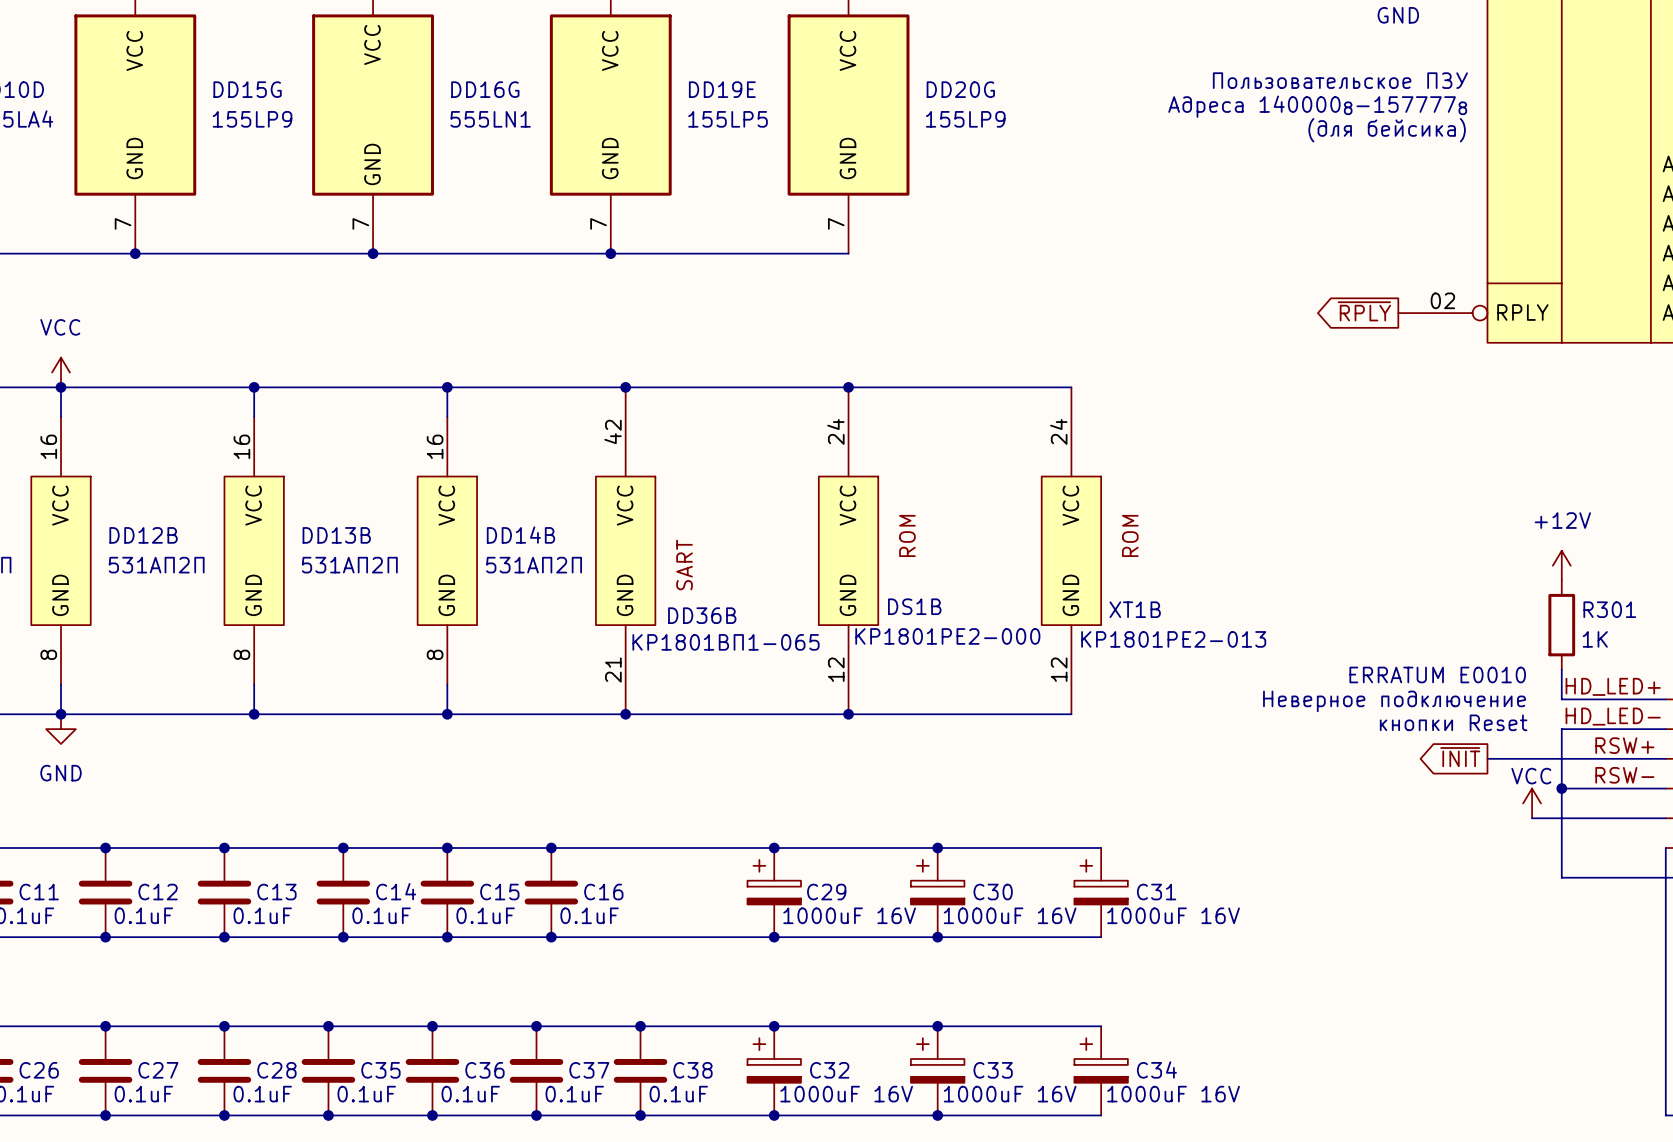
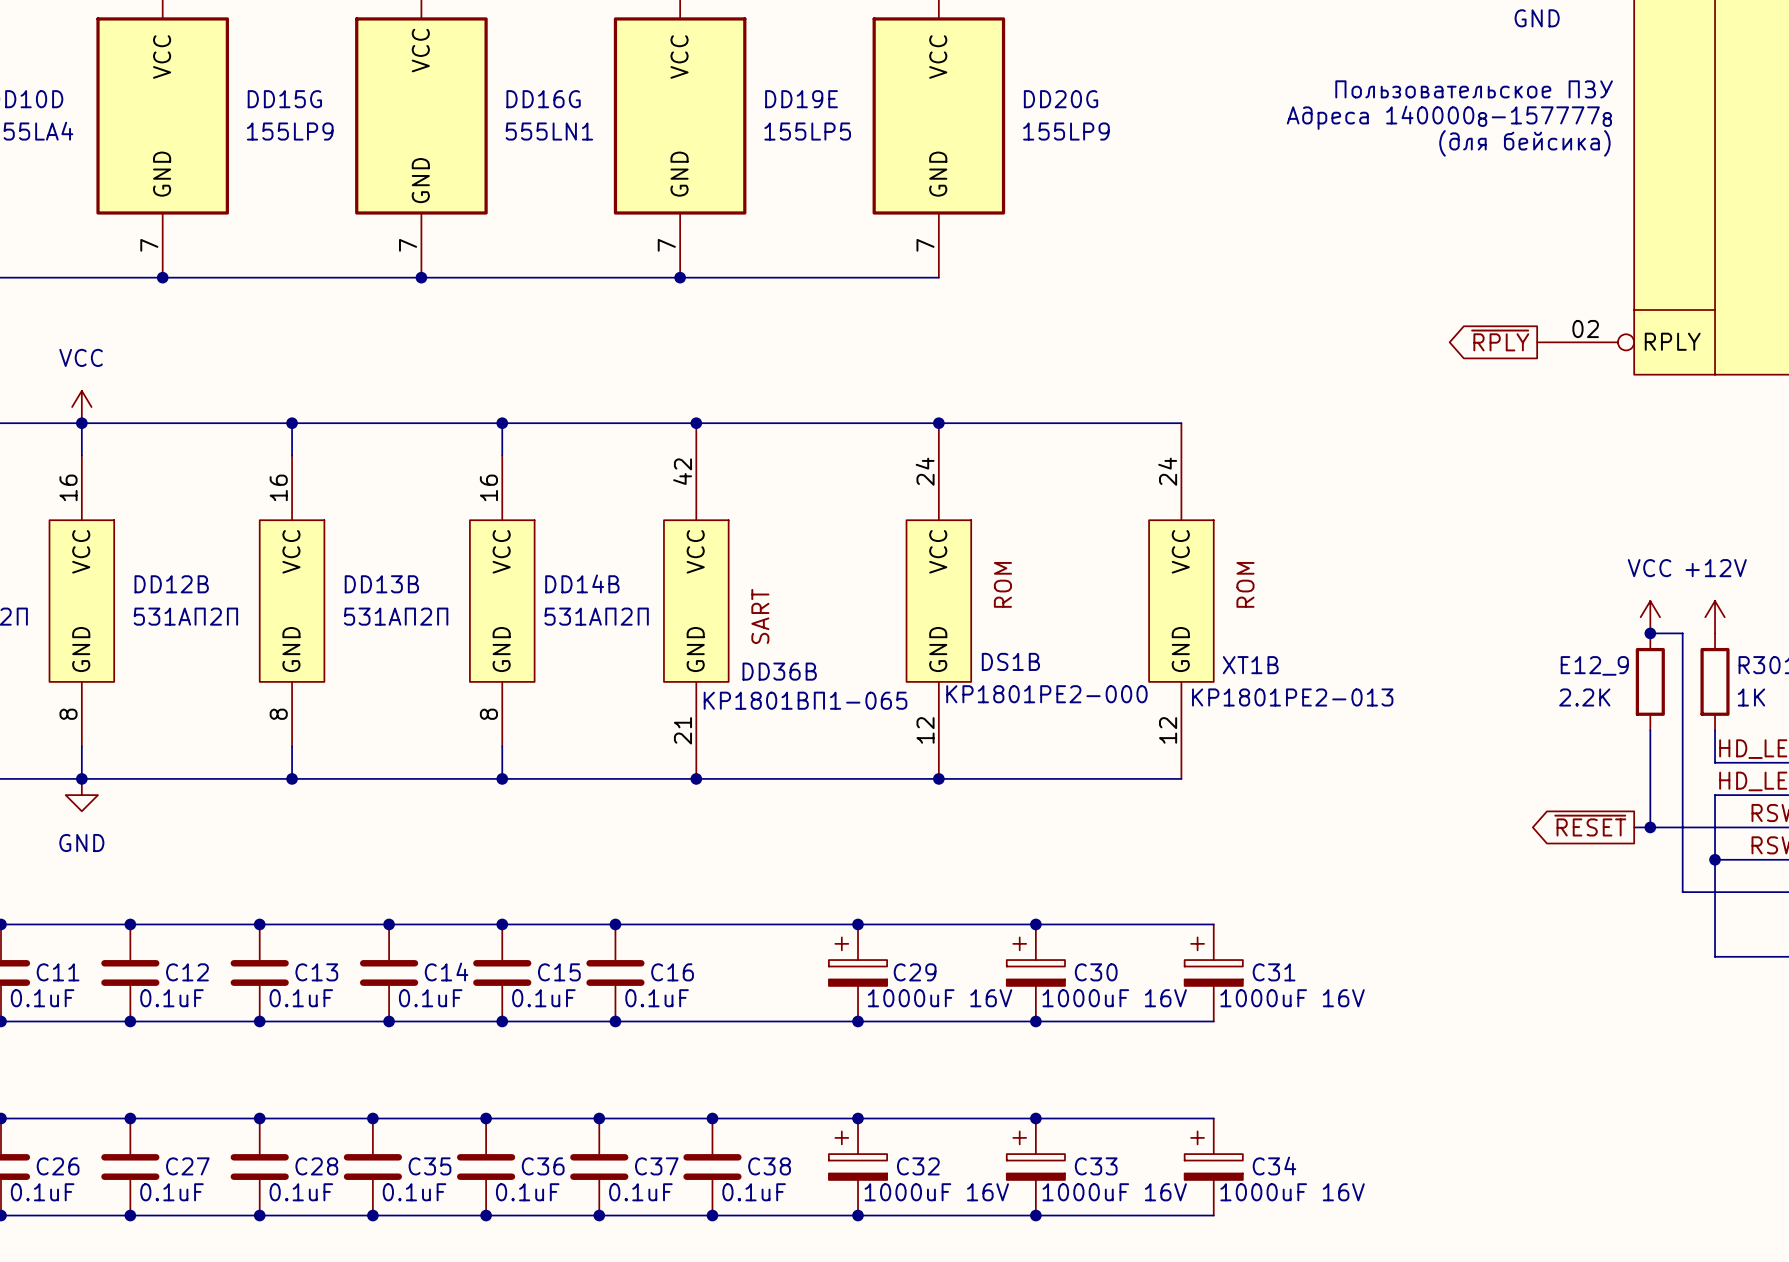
wire: none -> (1650, 633) (1682, 633) (1682, 892)
junction: none -> (1650, 633)
E12_9: none -> 2.2K (1650, 681)
wire: none -> (1650, 730) (1650, 827)
text: ERRATUM E0010 (1437, 674) -> none
text: Неверное подключение (1394, 701) -> none
text: кнопки Reset (1453, 722) -> none
global label: ~{INIT} (1460, 757) -> ~{RESET} (1590, 825)
junction: none -> (1650, 827)
power symbol text position: VCC (1531, 776) -> VCC (1649, 568)
power symbol position: VCC (1532, 803) -> VCC (1650, 617)

